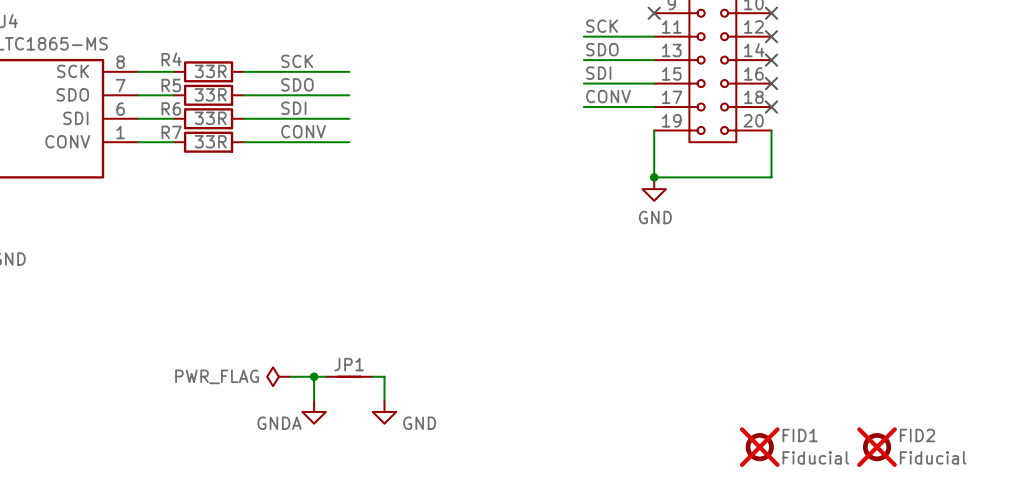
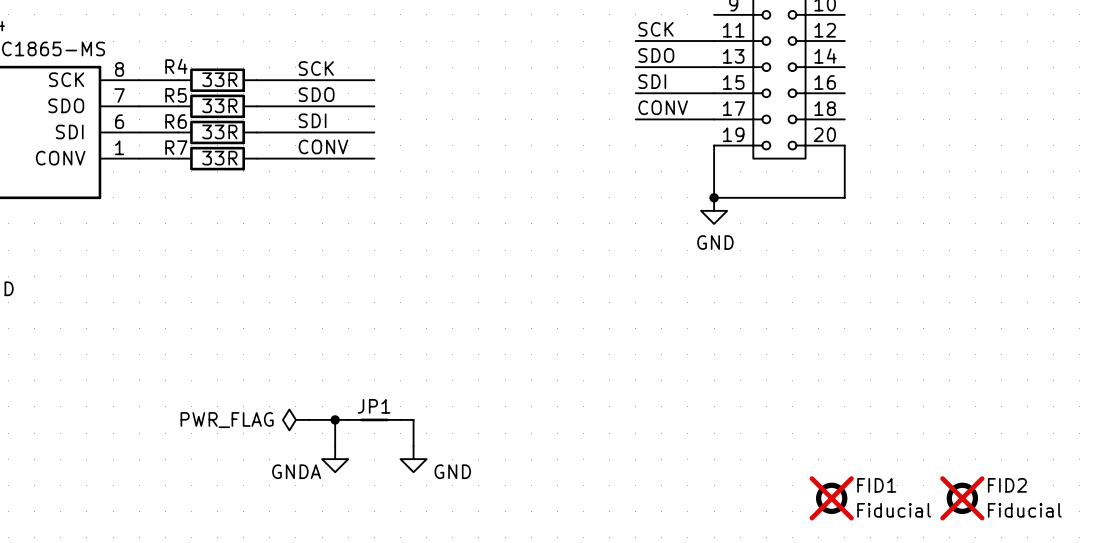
no-connect mark: (654, 13) -> none
no-connect mark: (771, 13) -> none
no-connect mark: (771, 36) -> none
no-connect mark: (771, 60) -> none
no-connect mark: (771, 83) -> none
no-connect mark: (771, 107) -> none

